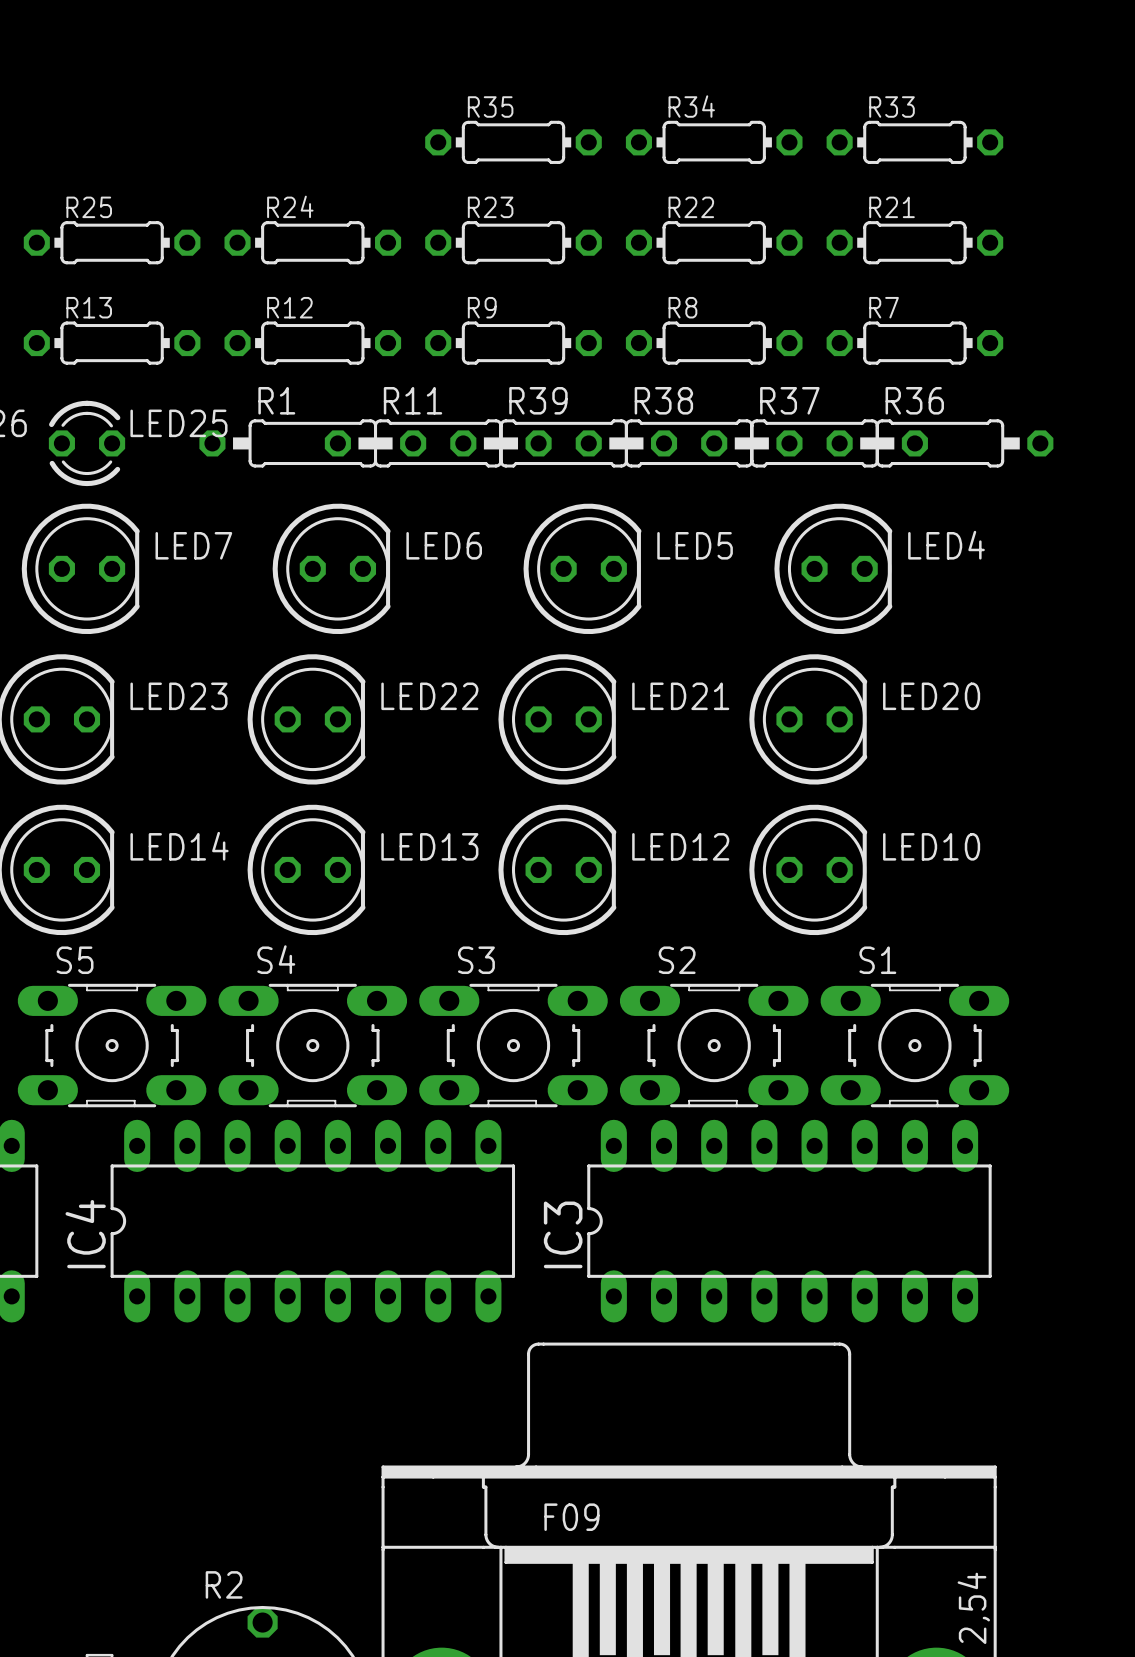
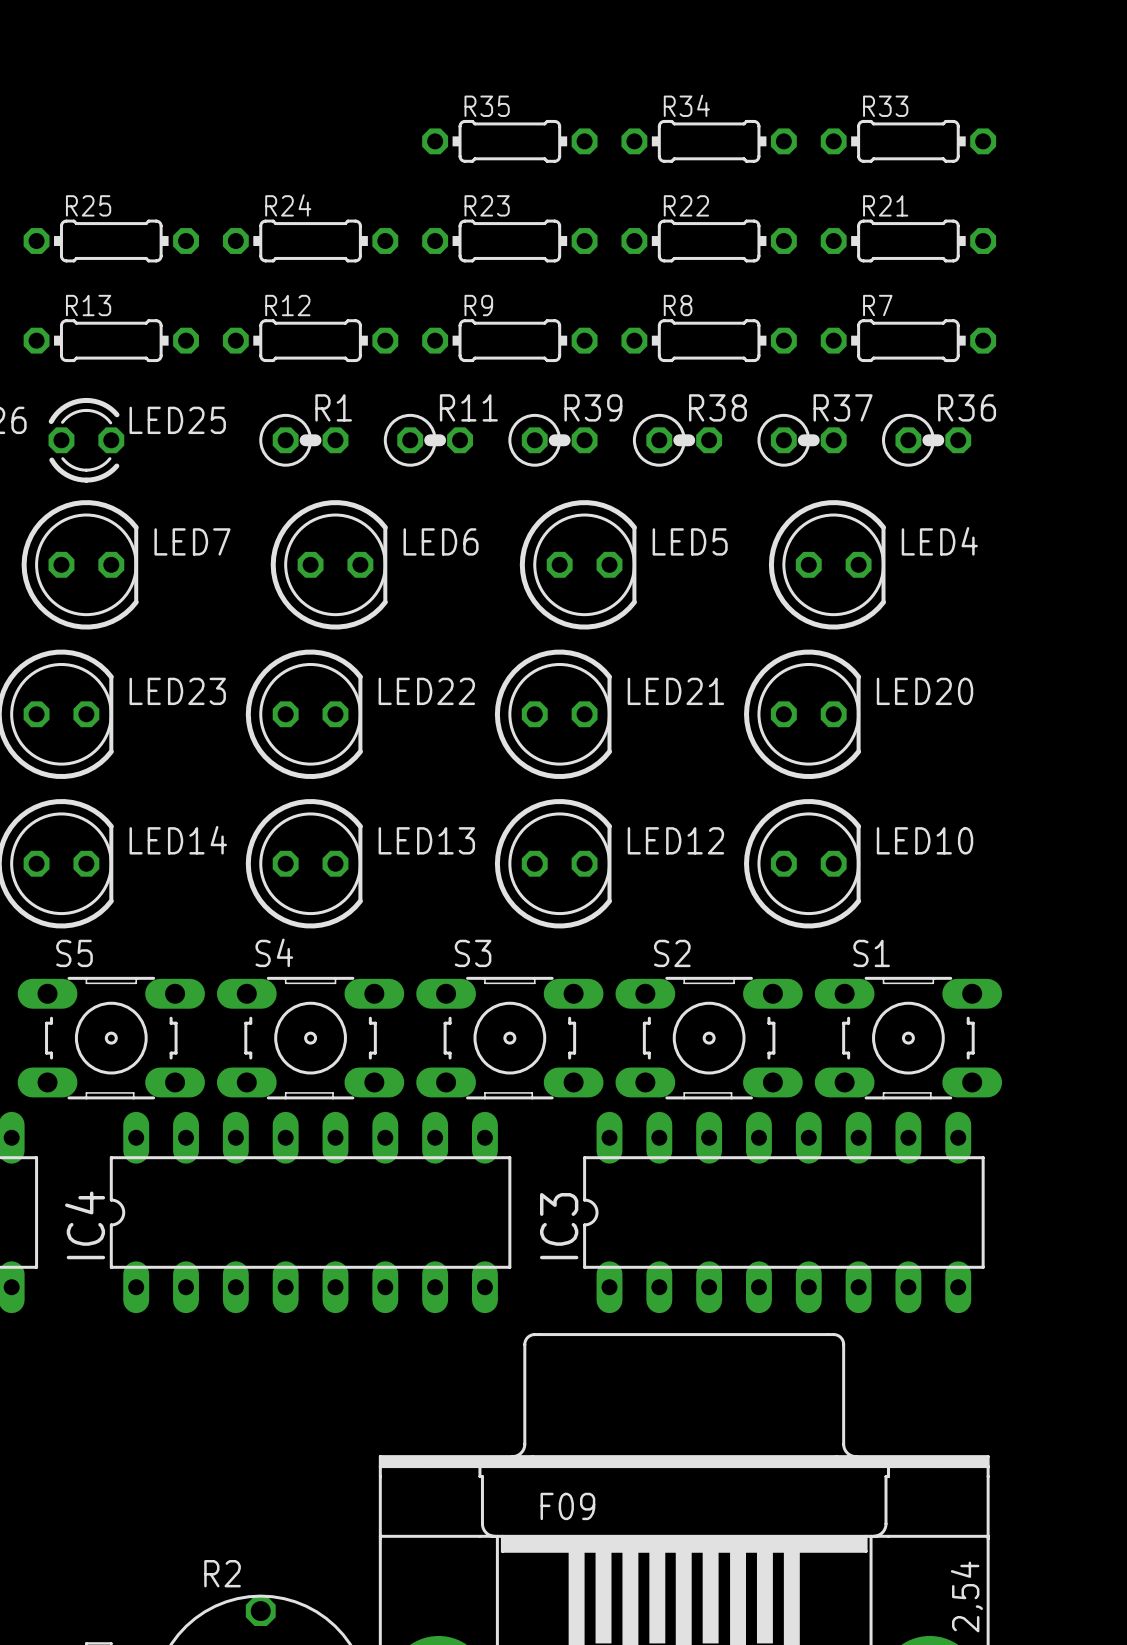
R1 name position: R1 (276, 400) -> R1 (333, 407)
R11 name position: R11 (413, 400) -> R11 (468, 407)
R39 name position: R39 (538, 400) -> R39 (593, 407)
R38 name position: R38 (663, 400) -> R38 (717, 407)
R37 name position: R37 (789, 400) -> R37 (843, 407)
R36 name position: R36 (914, 400) -> R36 (967, 407)
R1 footprint: [199, 419, 427, 468] -> [259, 413, 349, 467]
R11 footprint: [324, 419, 552, 468] -> [383, 413, 473, 467]
R39 footprint: [450, 419, 678, 468] -> [508, 413, 598, 467]
R38 footprint: [575, 419, 803, 468] -> [632, 413, 723, 467]
R37 footprint: [701, 419, 928, 468] -> [757, 413, 847, 467]
R36 footprint: [826, 419, 1054, 468] -> [882, 413, 972, 467]

